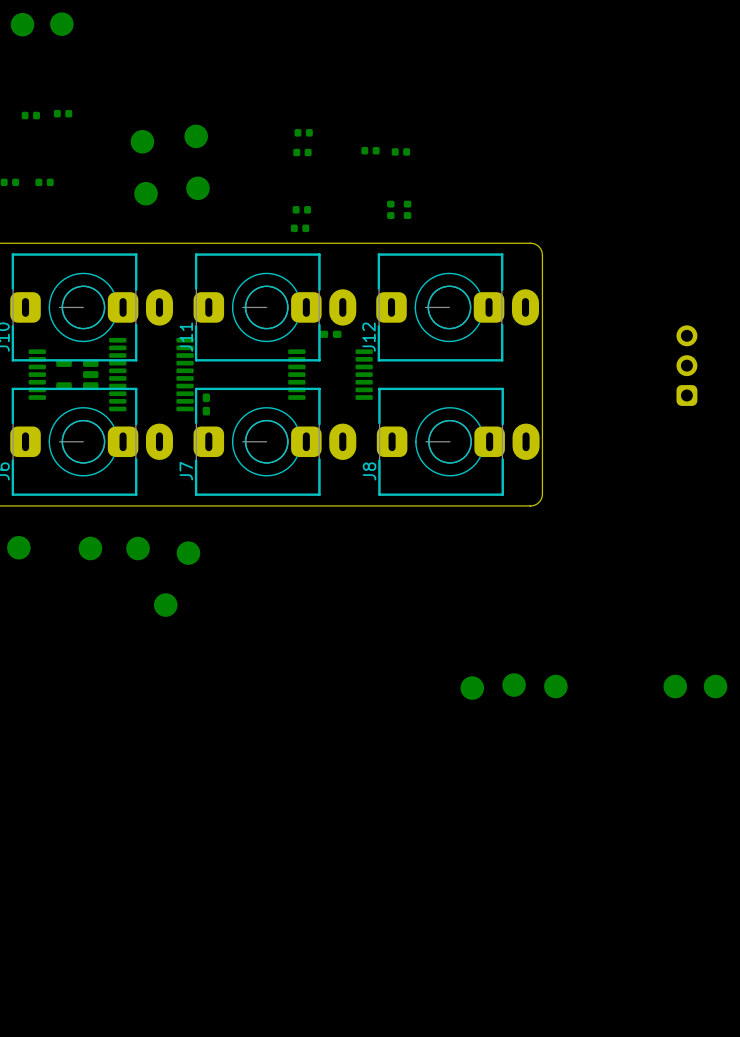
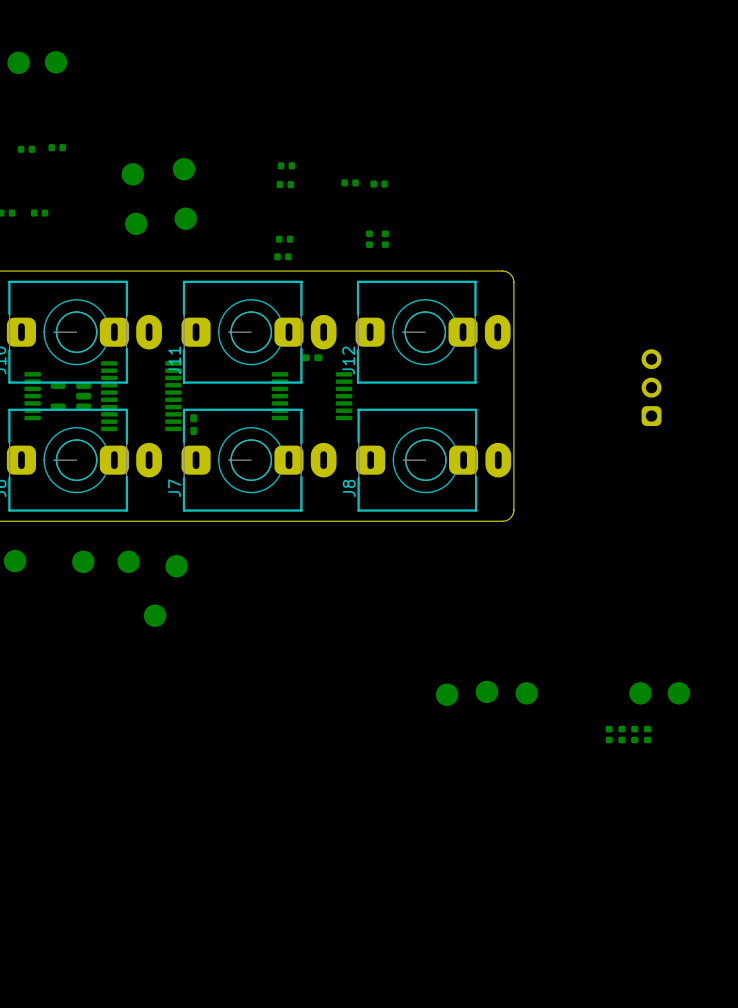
part: none -> (609, 734)
part: none -> (621, 734)
part: none -> (634, 734)
part: none -> (647, 734)

